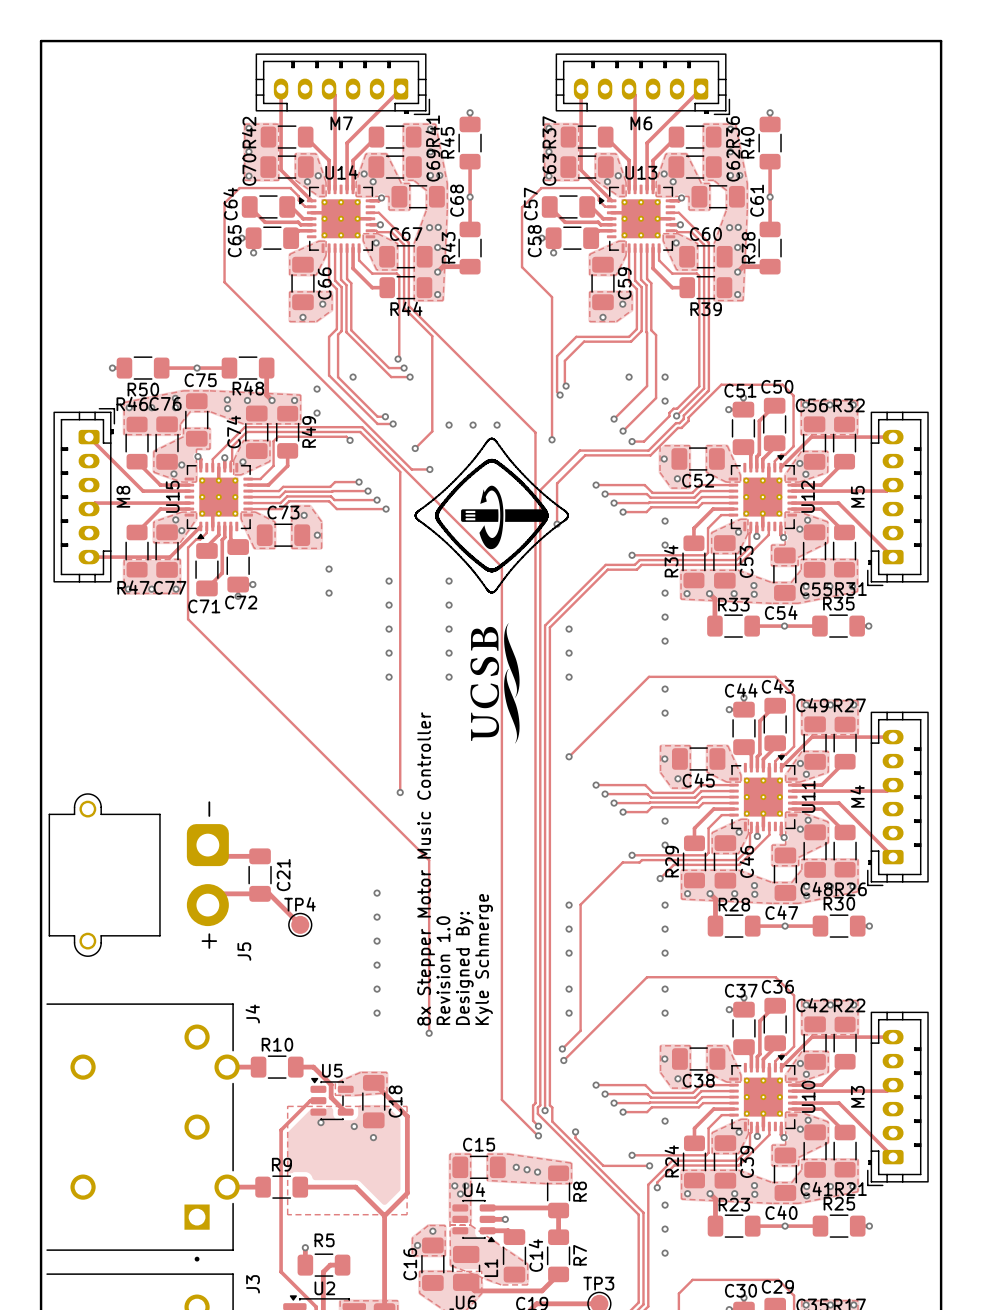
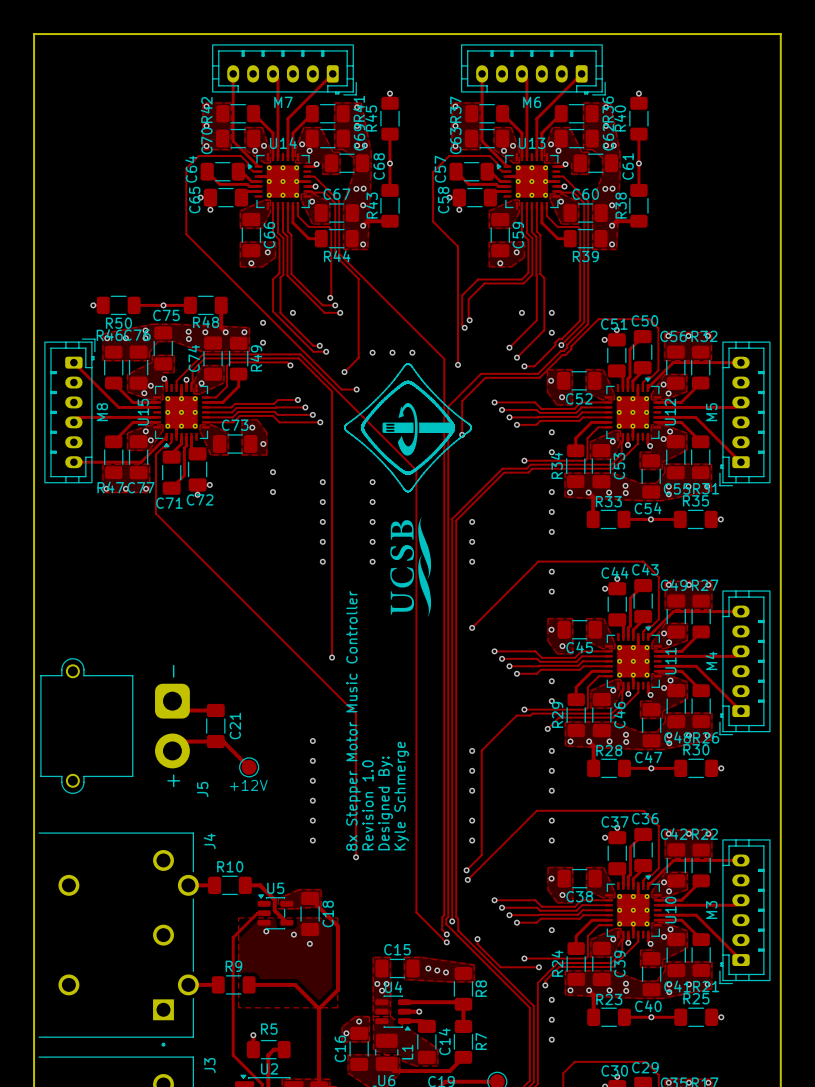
TP4 name: TP4 (299, 904) -> none
text: none -> +12V (248, 785)
TP3 name: TP3 (598, 1283) -> none

